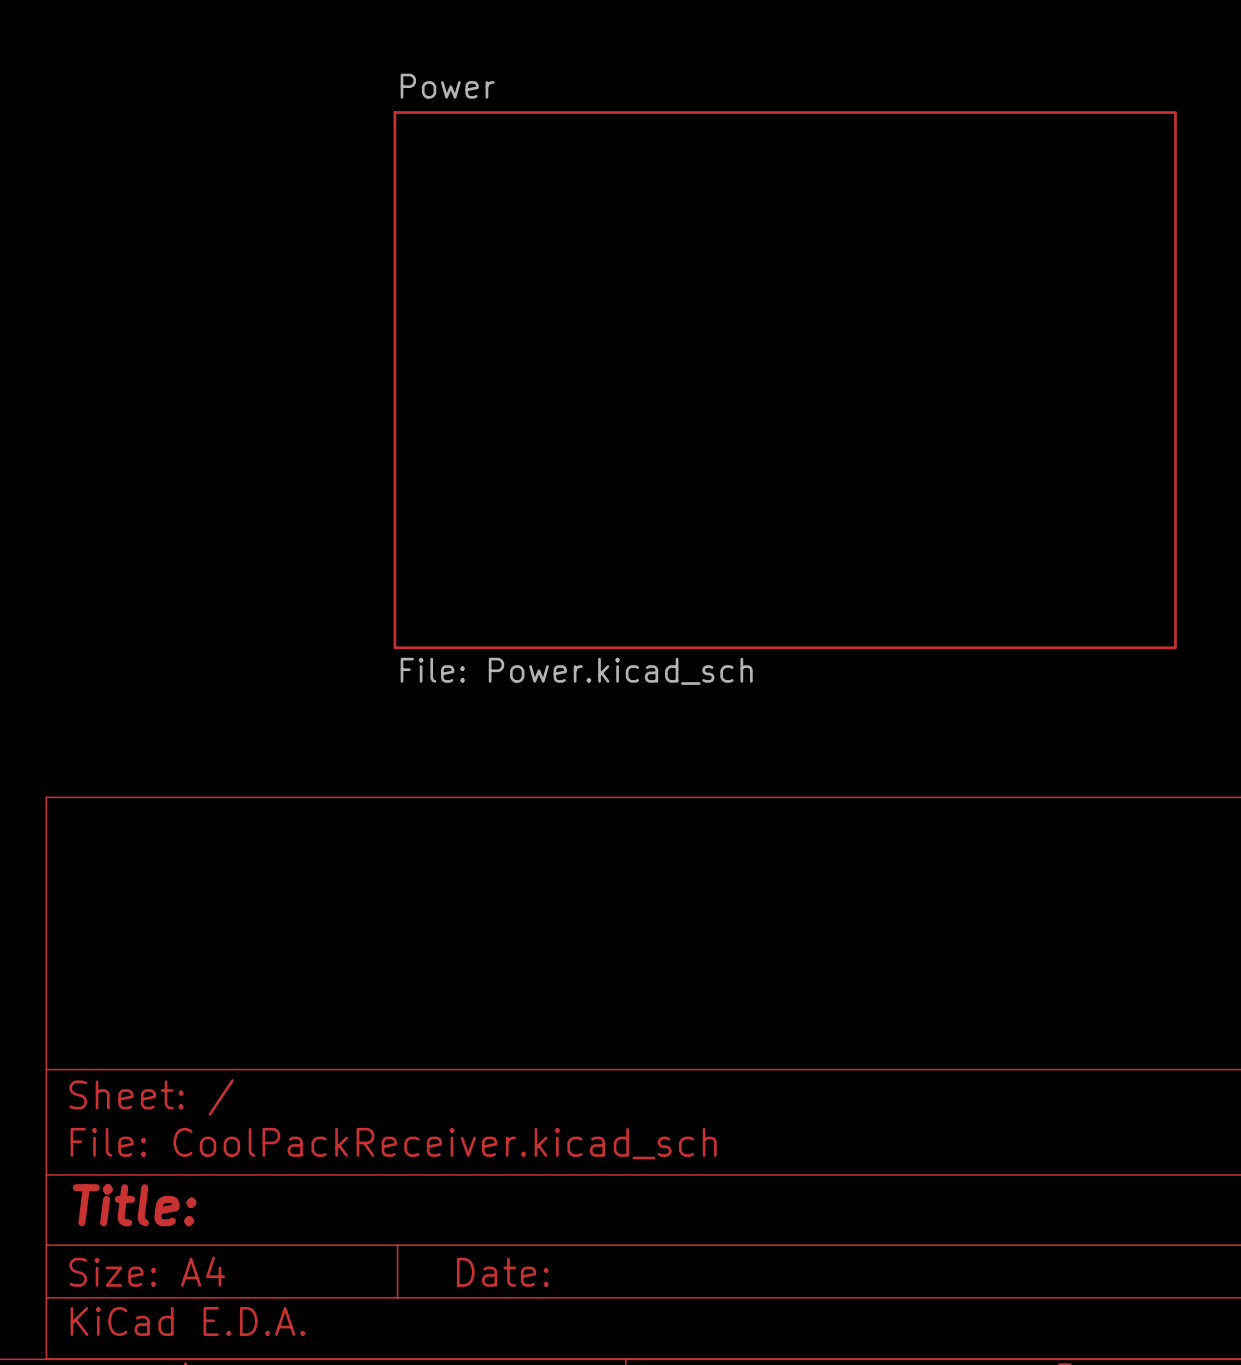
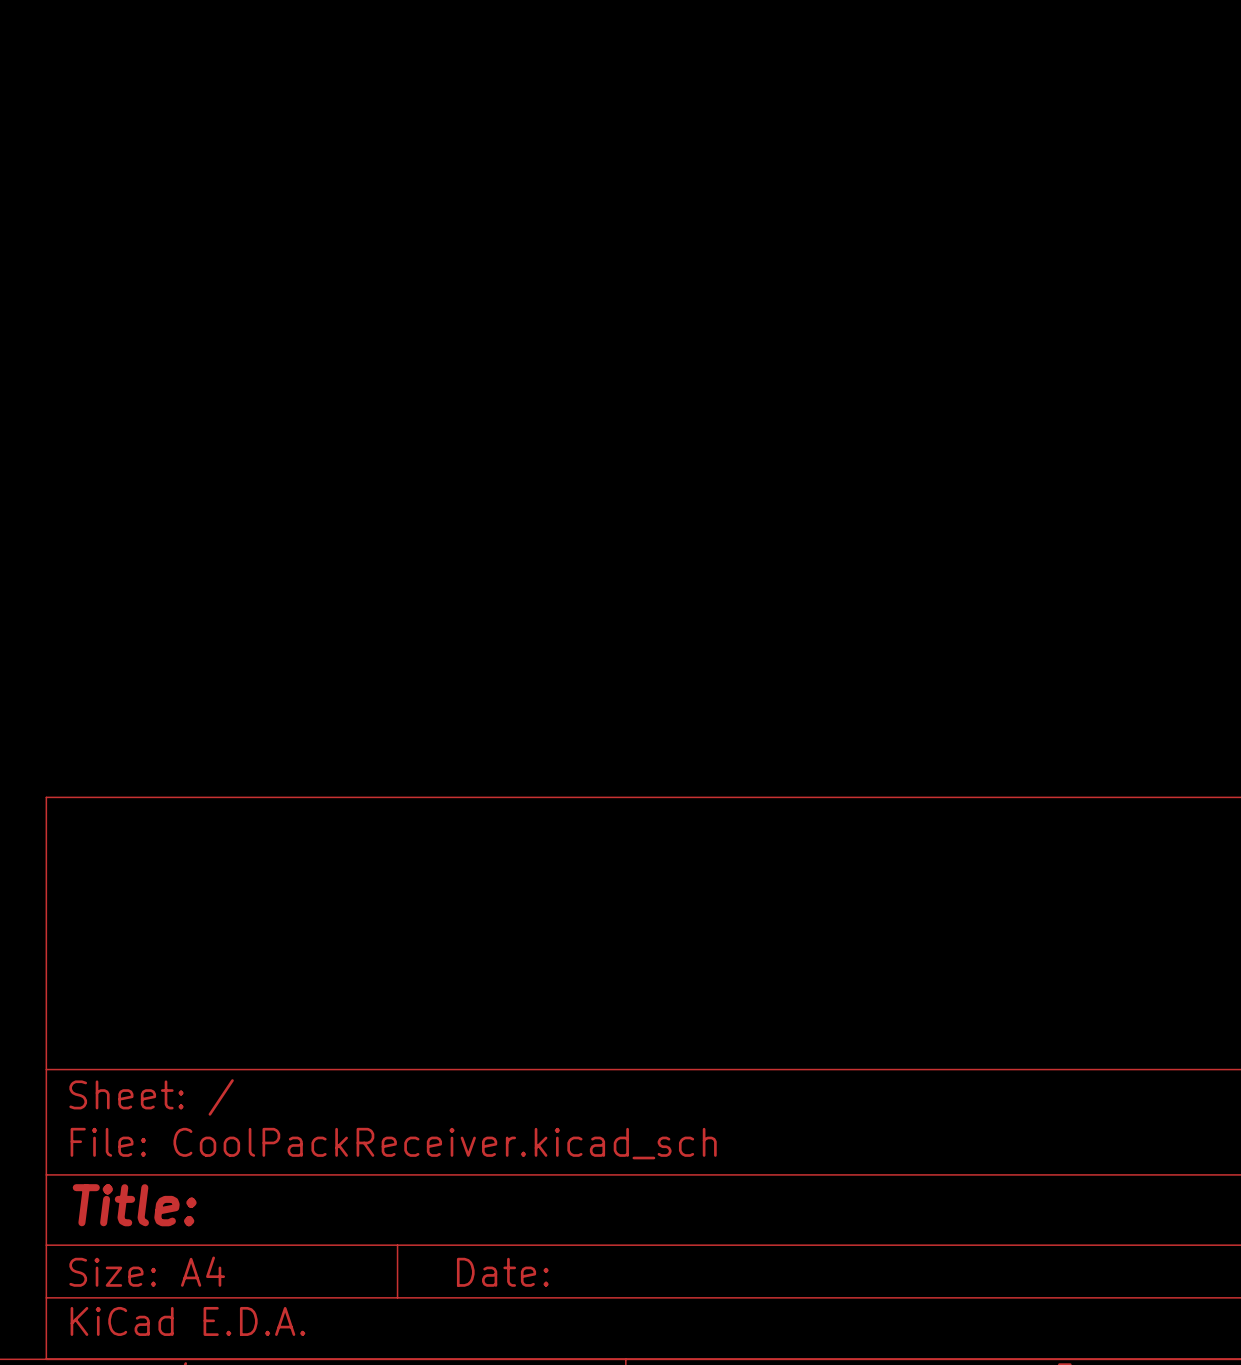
sheet Power: File: Power.kicad_sch (785, 380) -> none

